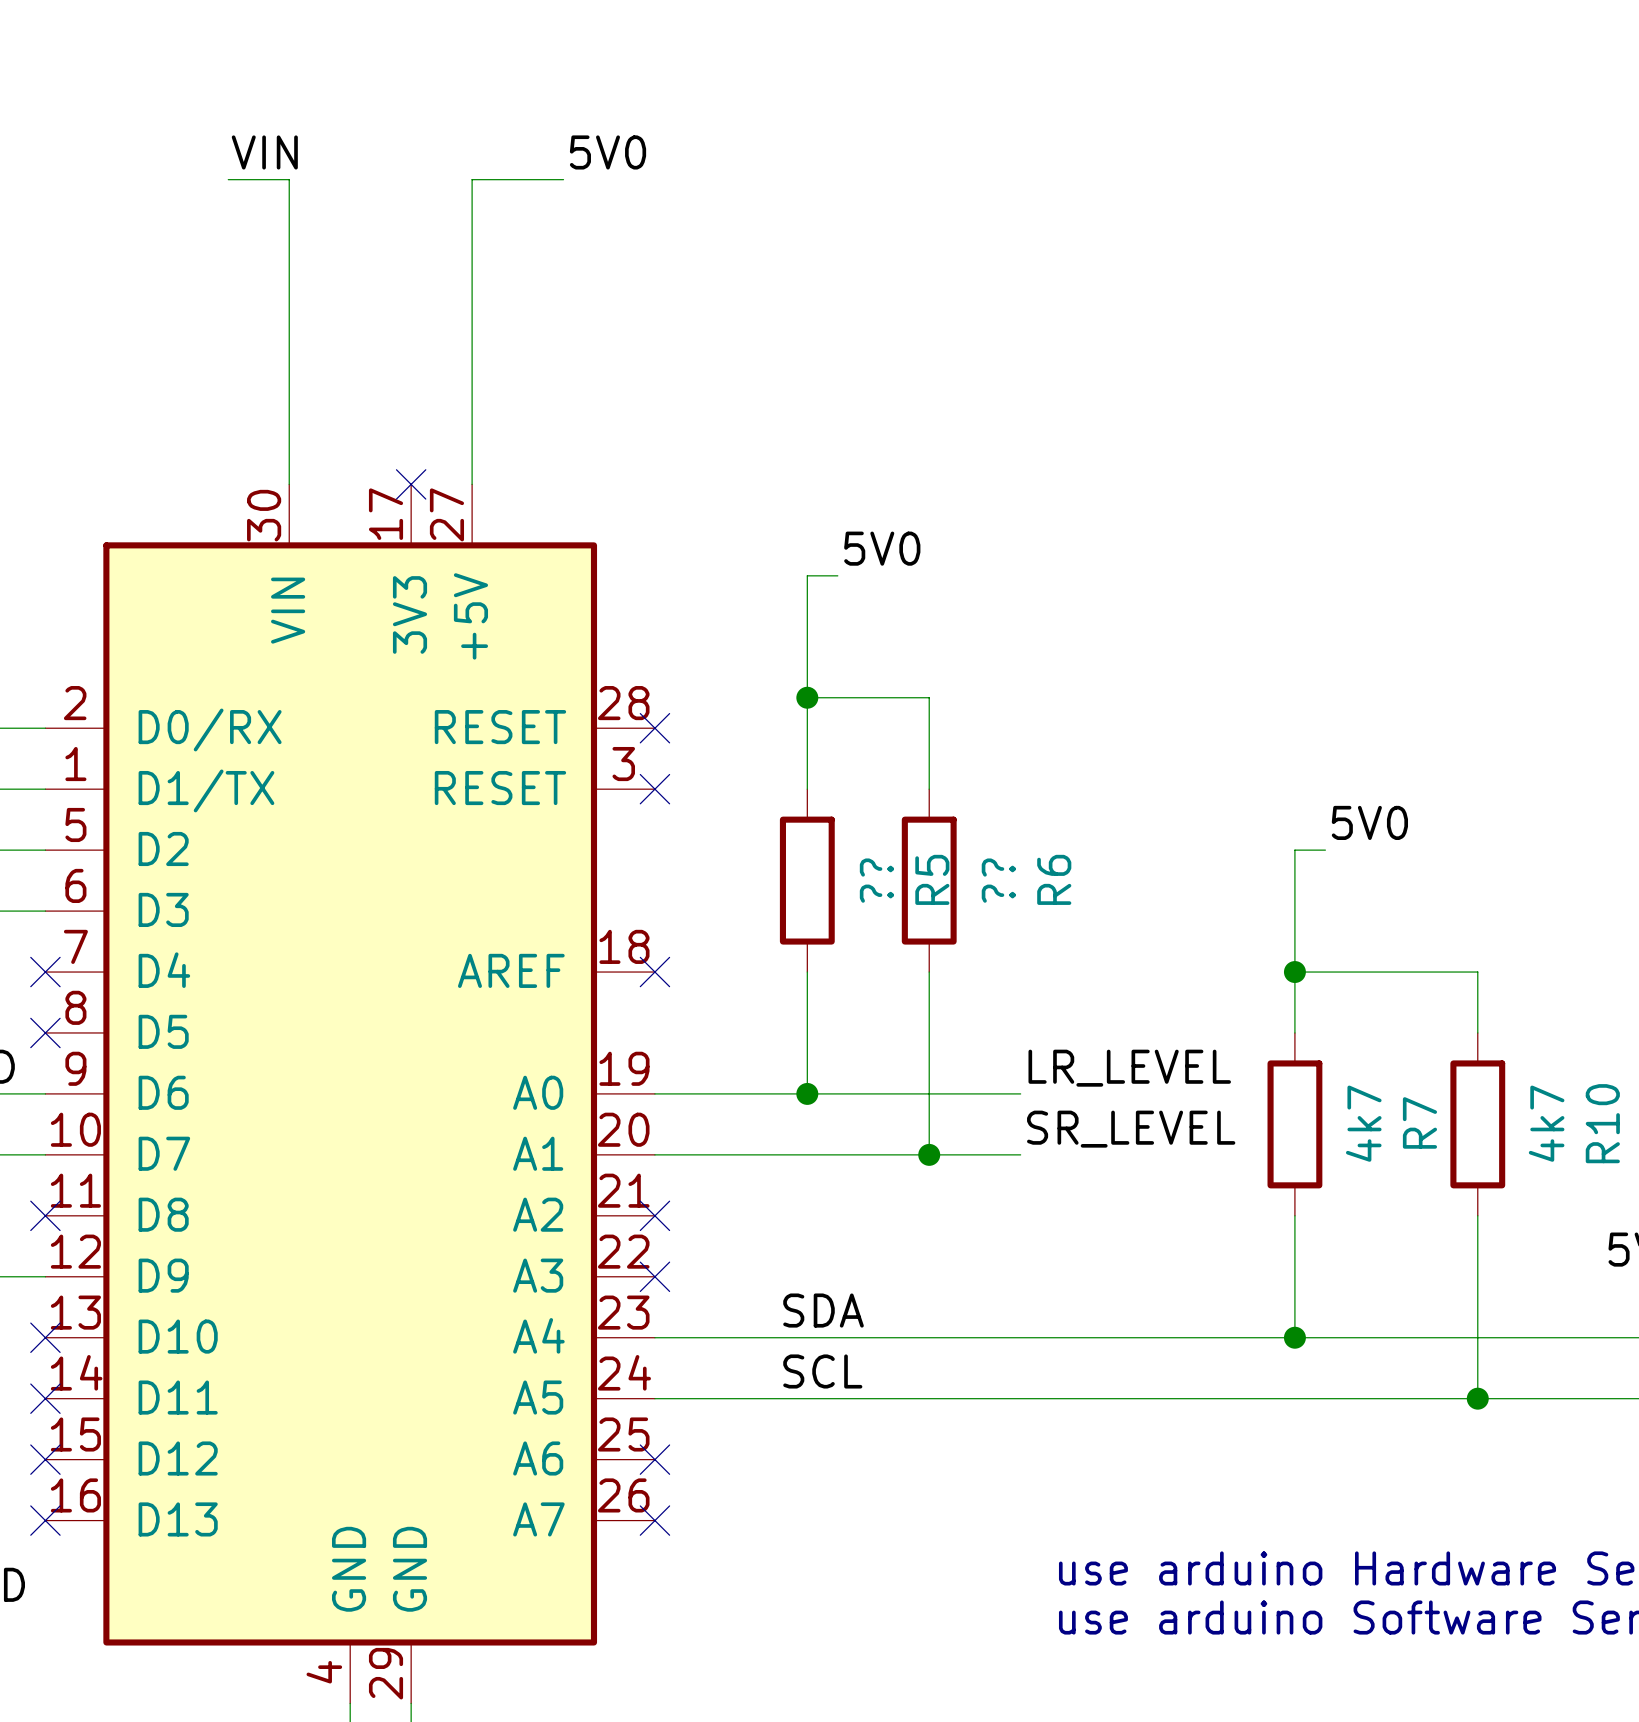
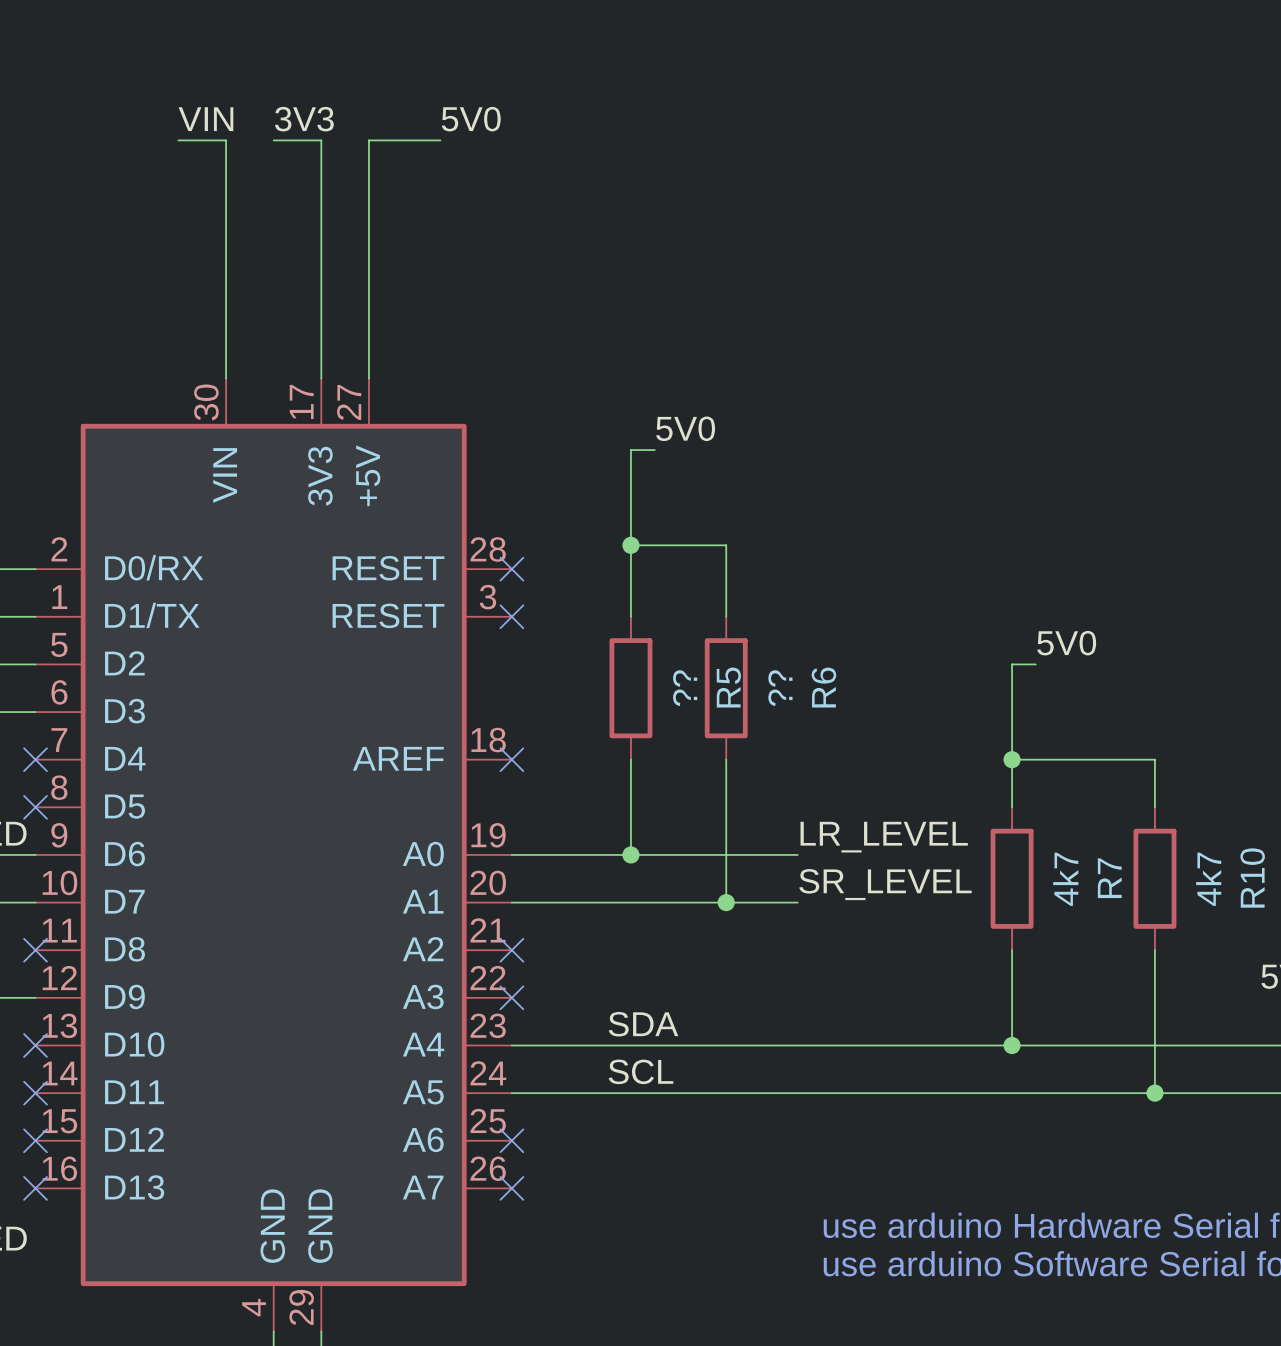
label: none -> 3V3 (304, 119)
wire: none -> (273, 140) (321, 140) (321, 378)
no-connect mark: (411, 484) -> none

